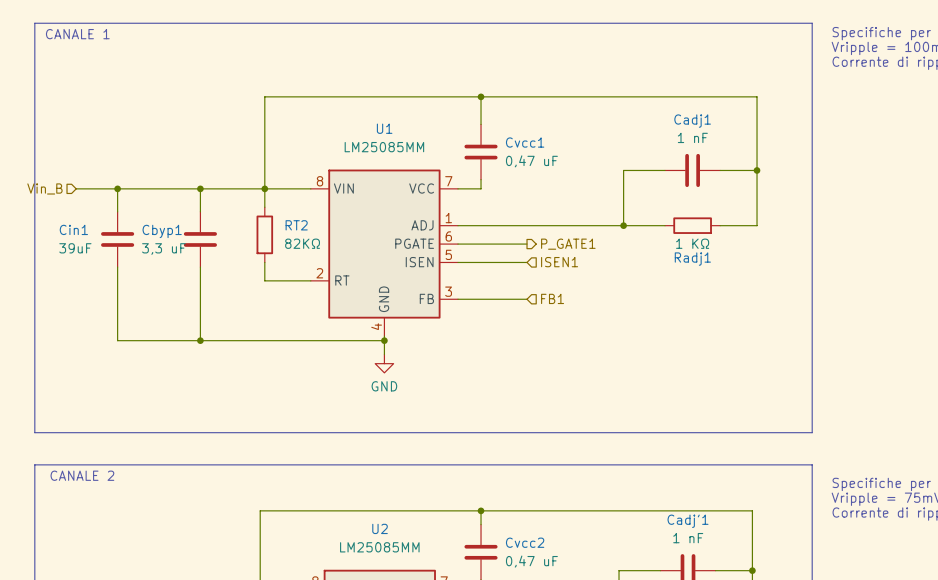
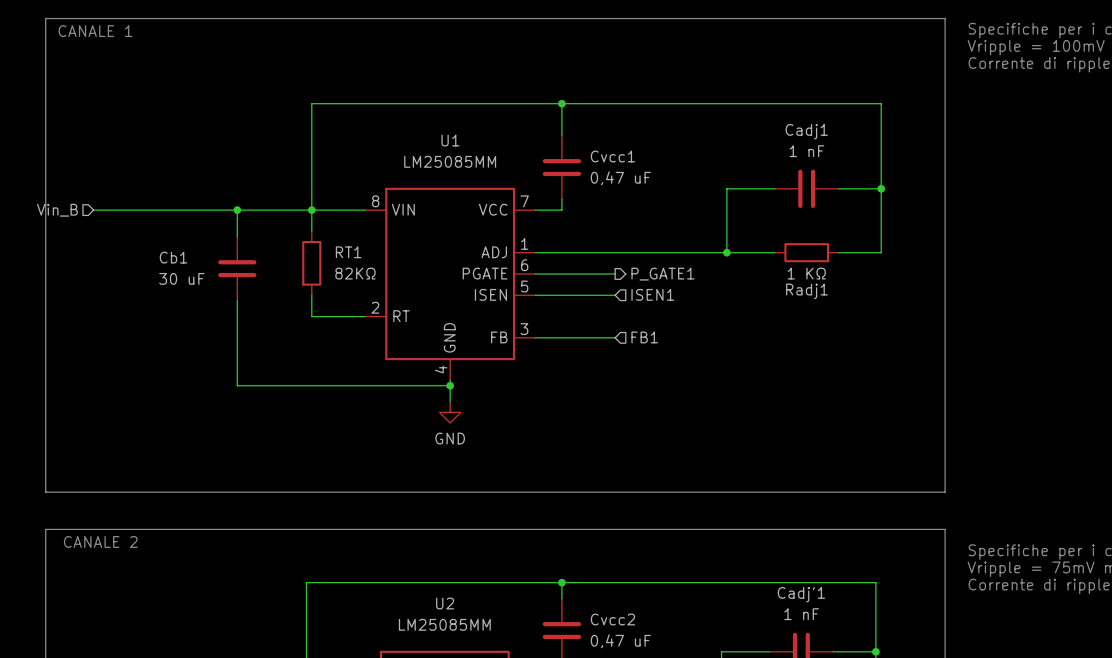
wire: (117, 188) (117, 211) -> none
junction: (117, 188) -> none
RT2 name: RT2 (296, 225) -> RT1 (348, 252)
Cbyp1 name: Cbyp1 (162, 231) -> Cb1 (173, 257)
Cin1: 39uF (117, 239) -> none
Cbyp1 value: 3,3 uF (163, 248) -> 30 uF (181, 278)
wire: (117, 267) (117, 340) (200, 340) -> none
junction: (200, 340) -> none

